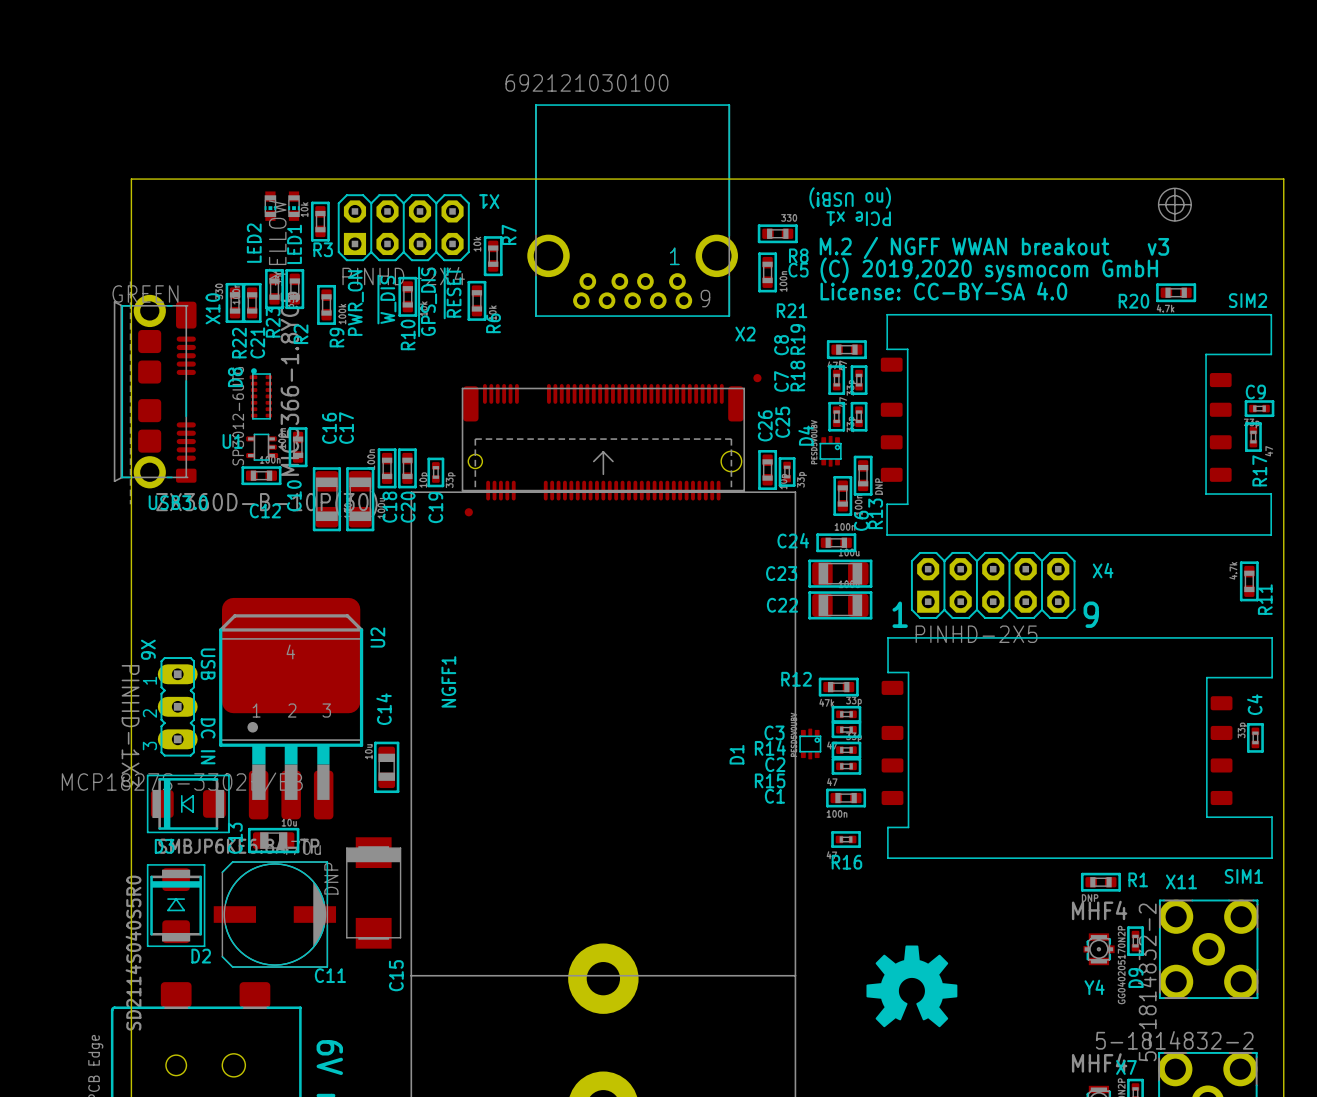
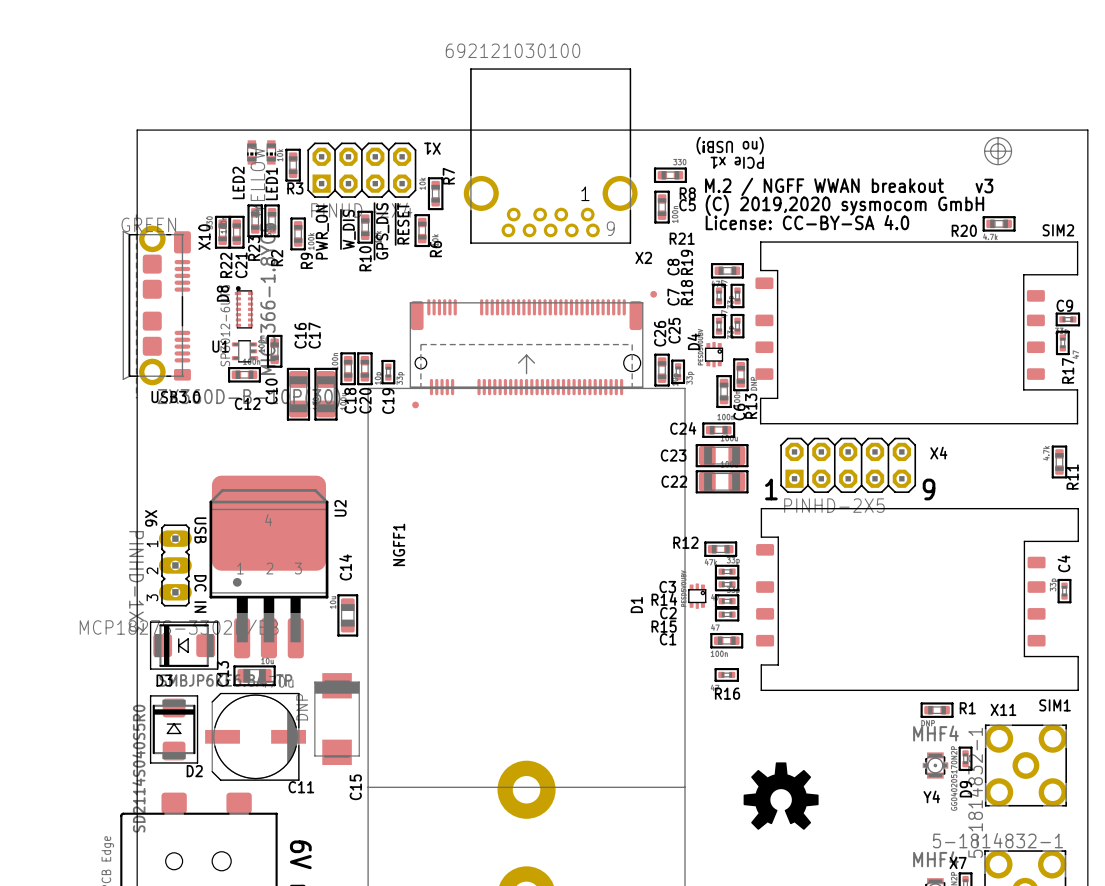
X11 value: 5-1814832-2 (1147, 982) -> 5-1814832-1 (975, 792)
X7 value: 5-1814832-2 (1174, 1040) -> 5-1814832-1 (997, 840)

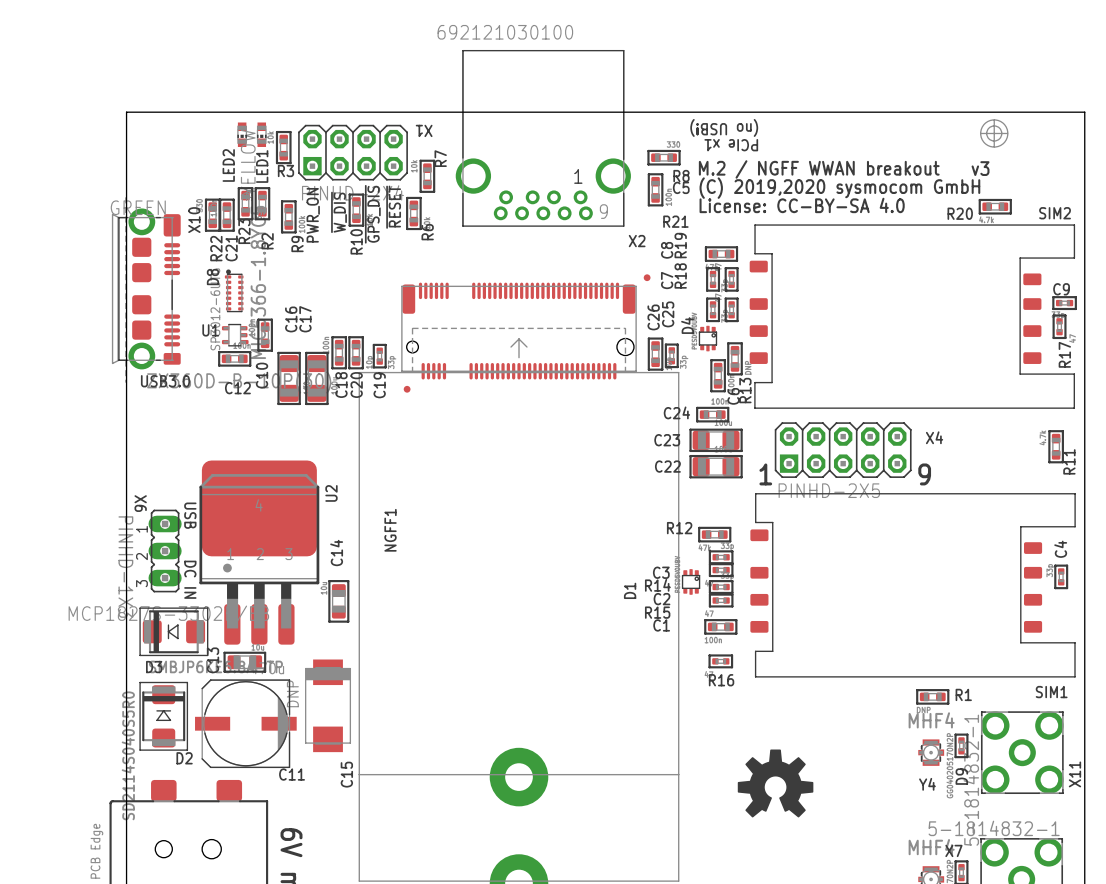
X11 name rotation: 0° (1003, 709) -> 90° counterclockwise (1074, 774)
X11 name position: X11 (1003, 709) -> X11 (1074, 774)

